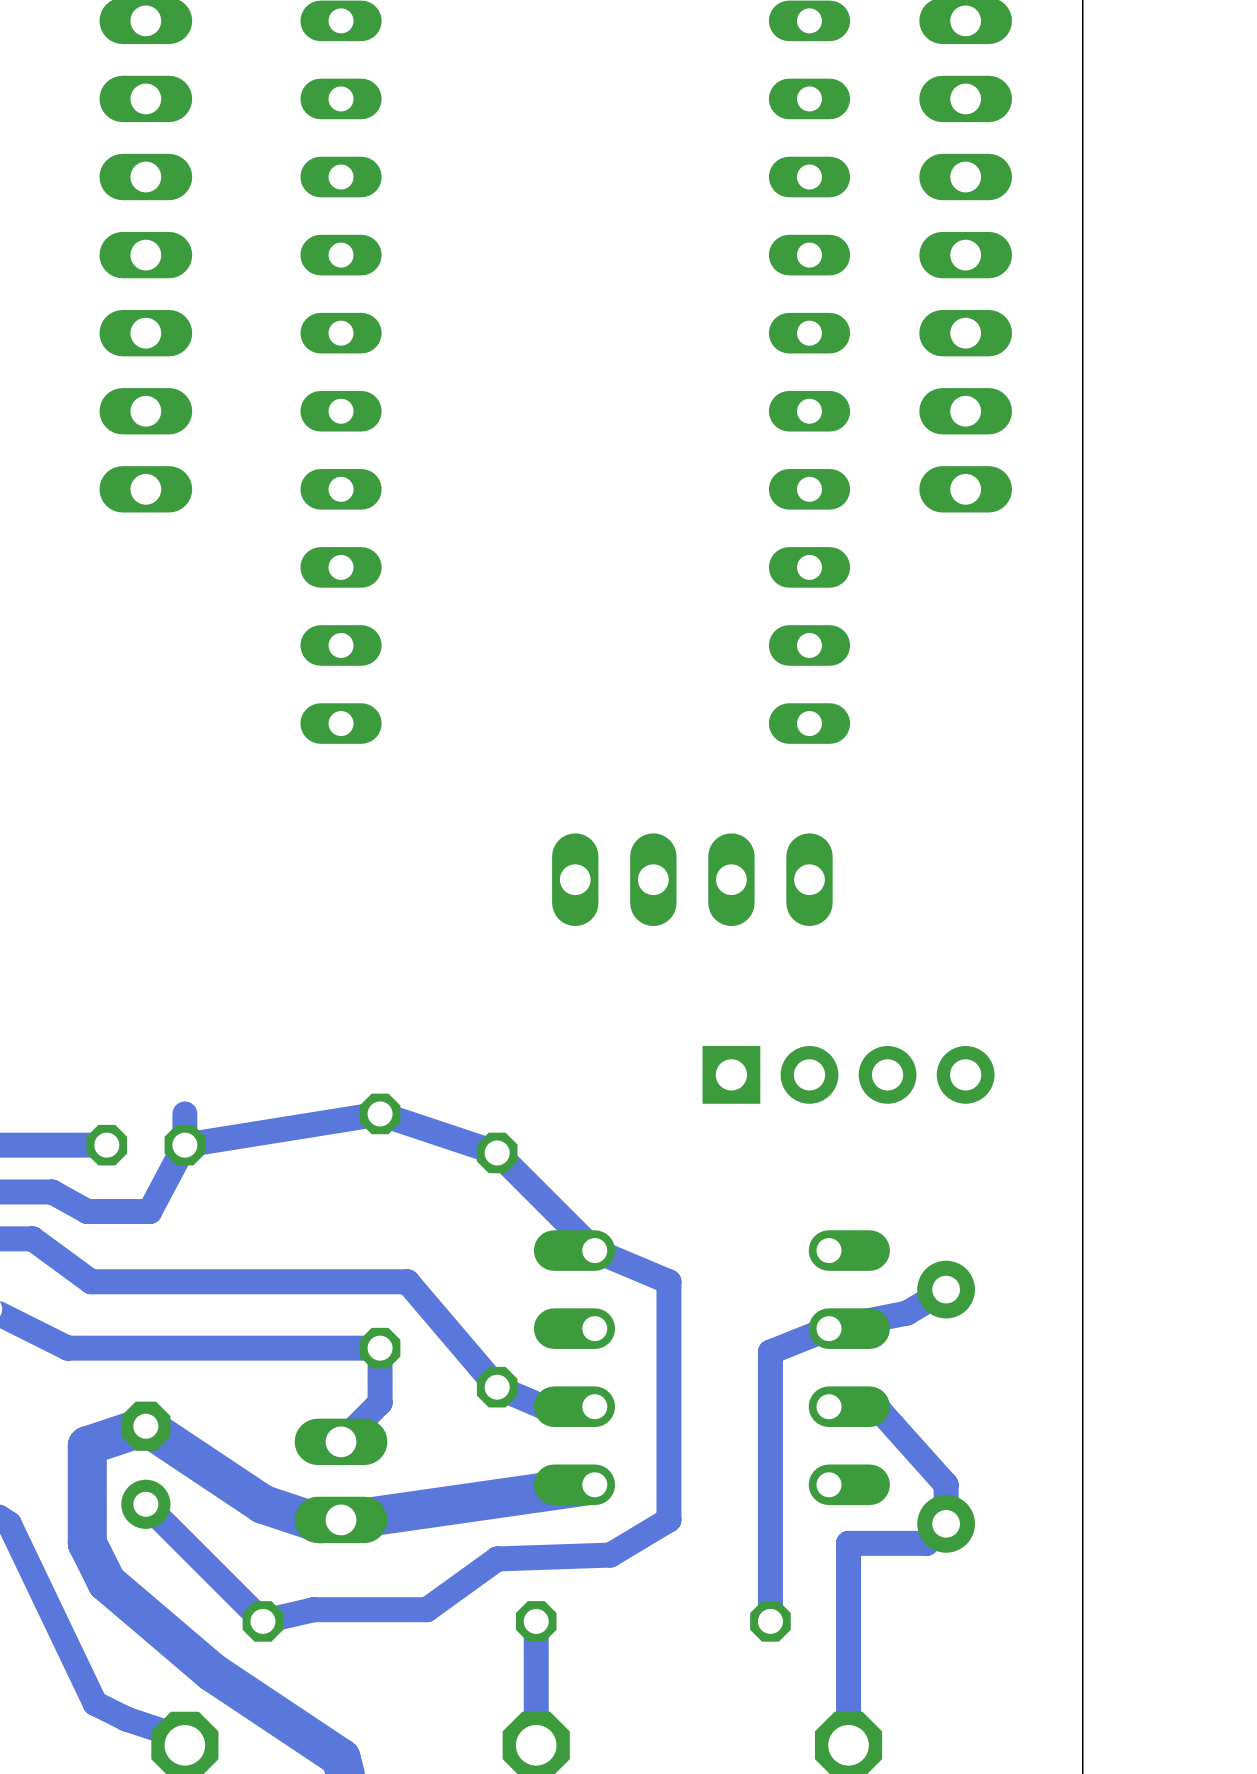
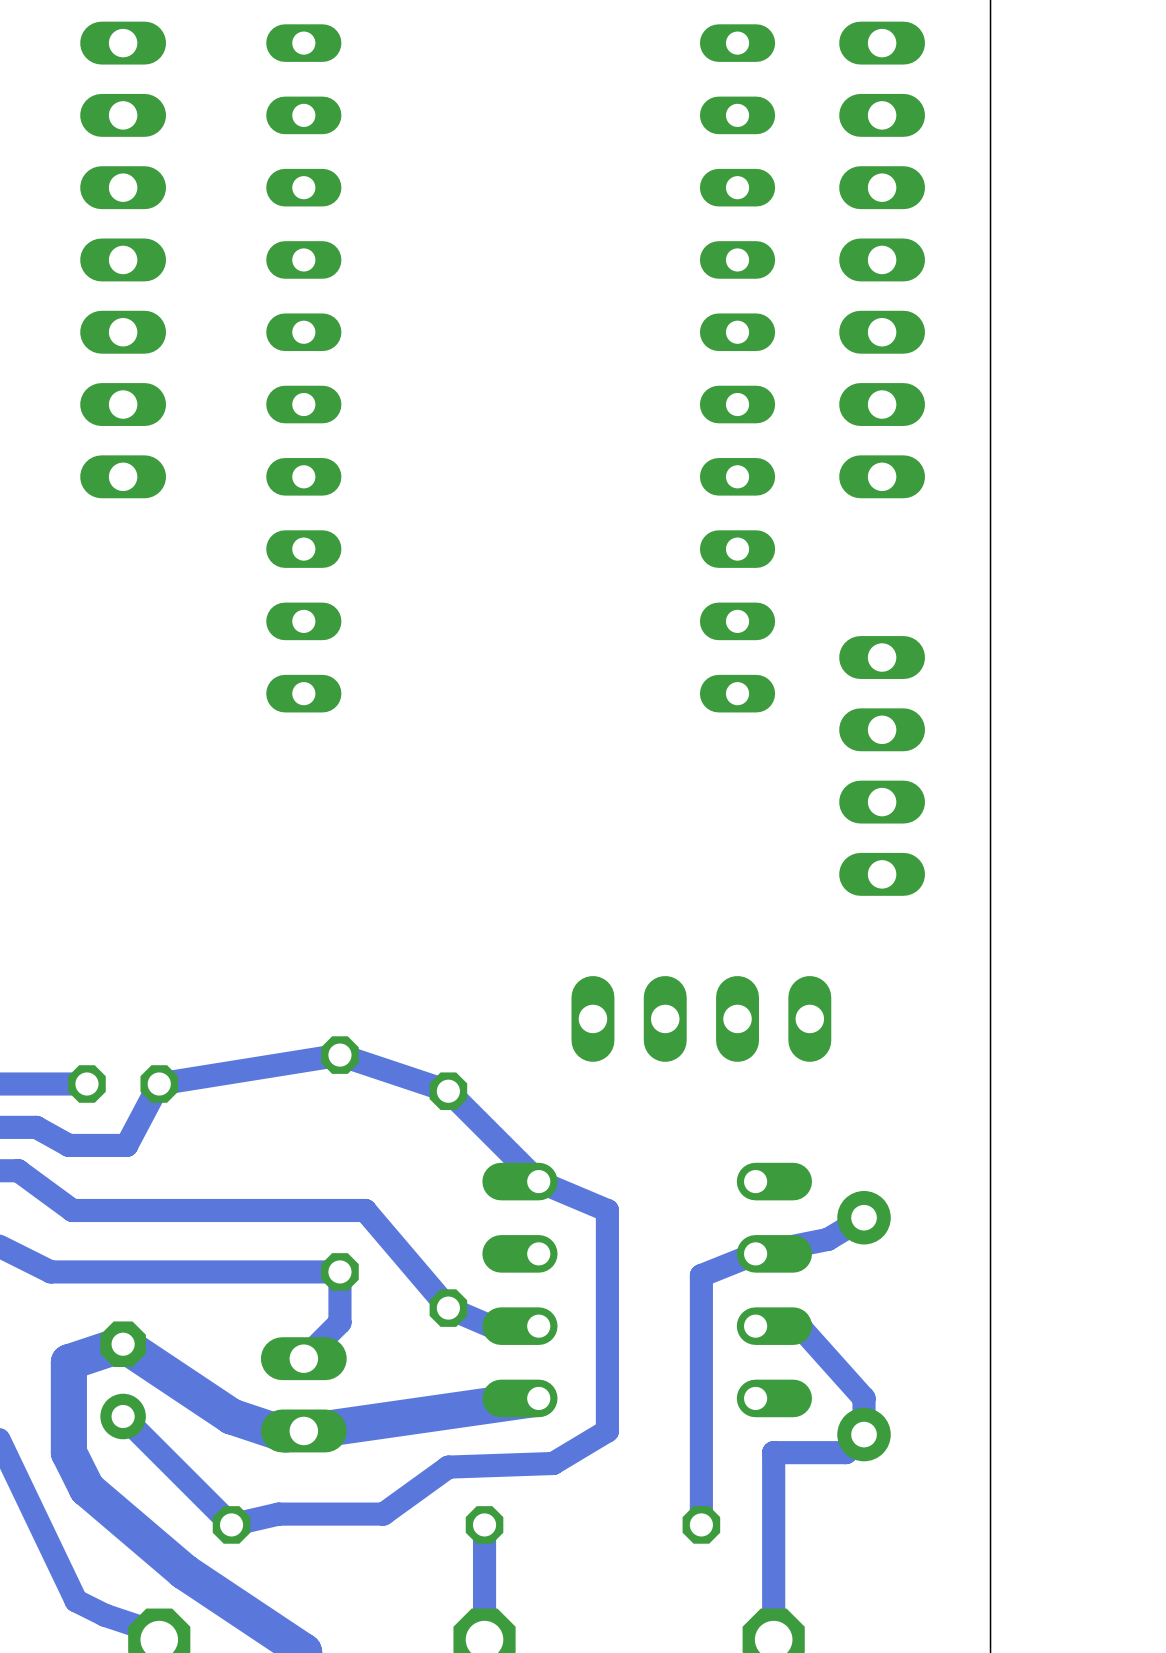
part: none -> (882, 765)
part: (692, 879) -> none
part: none -> (701, 1018)
part: (848, 1074) -> none
track: (184, 1113) (184, 1145) -> none

